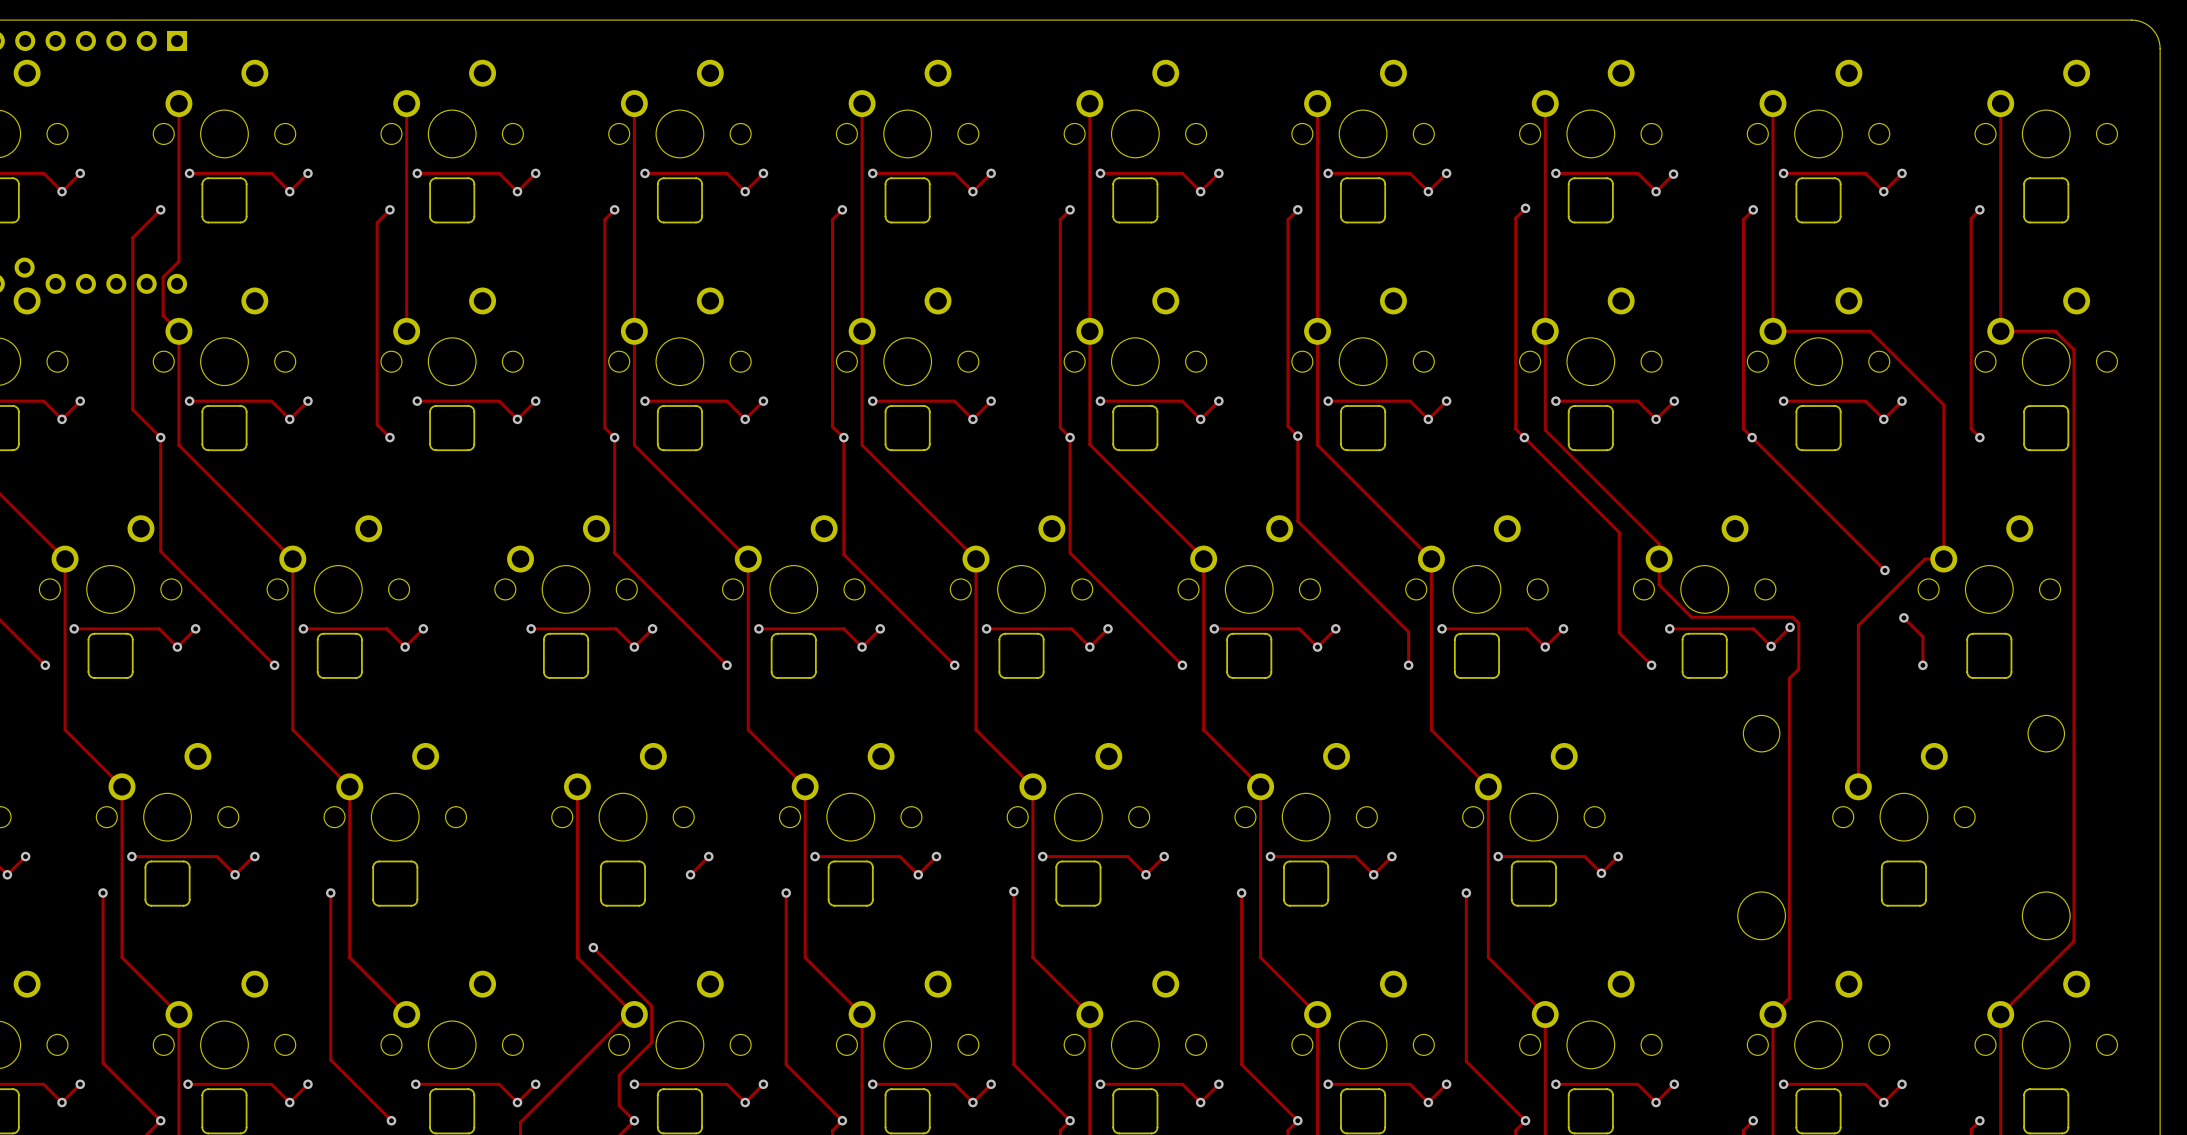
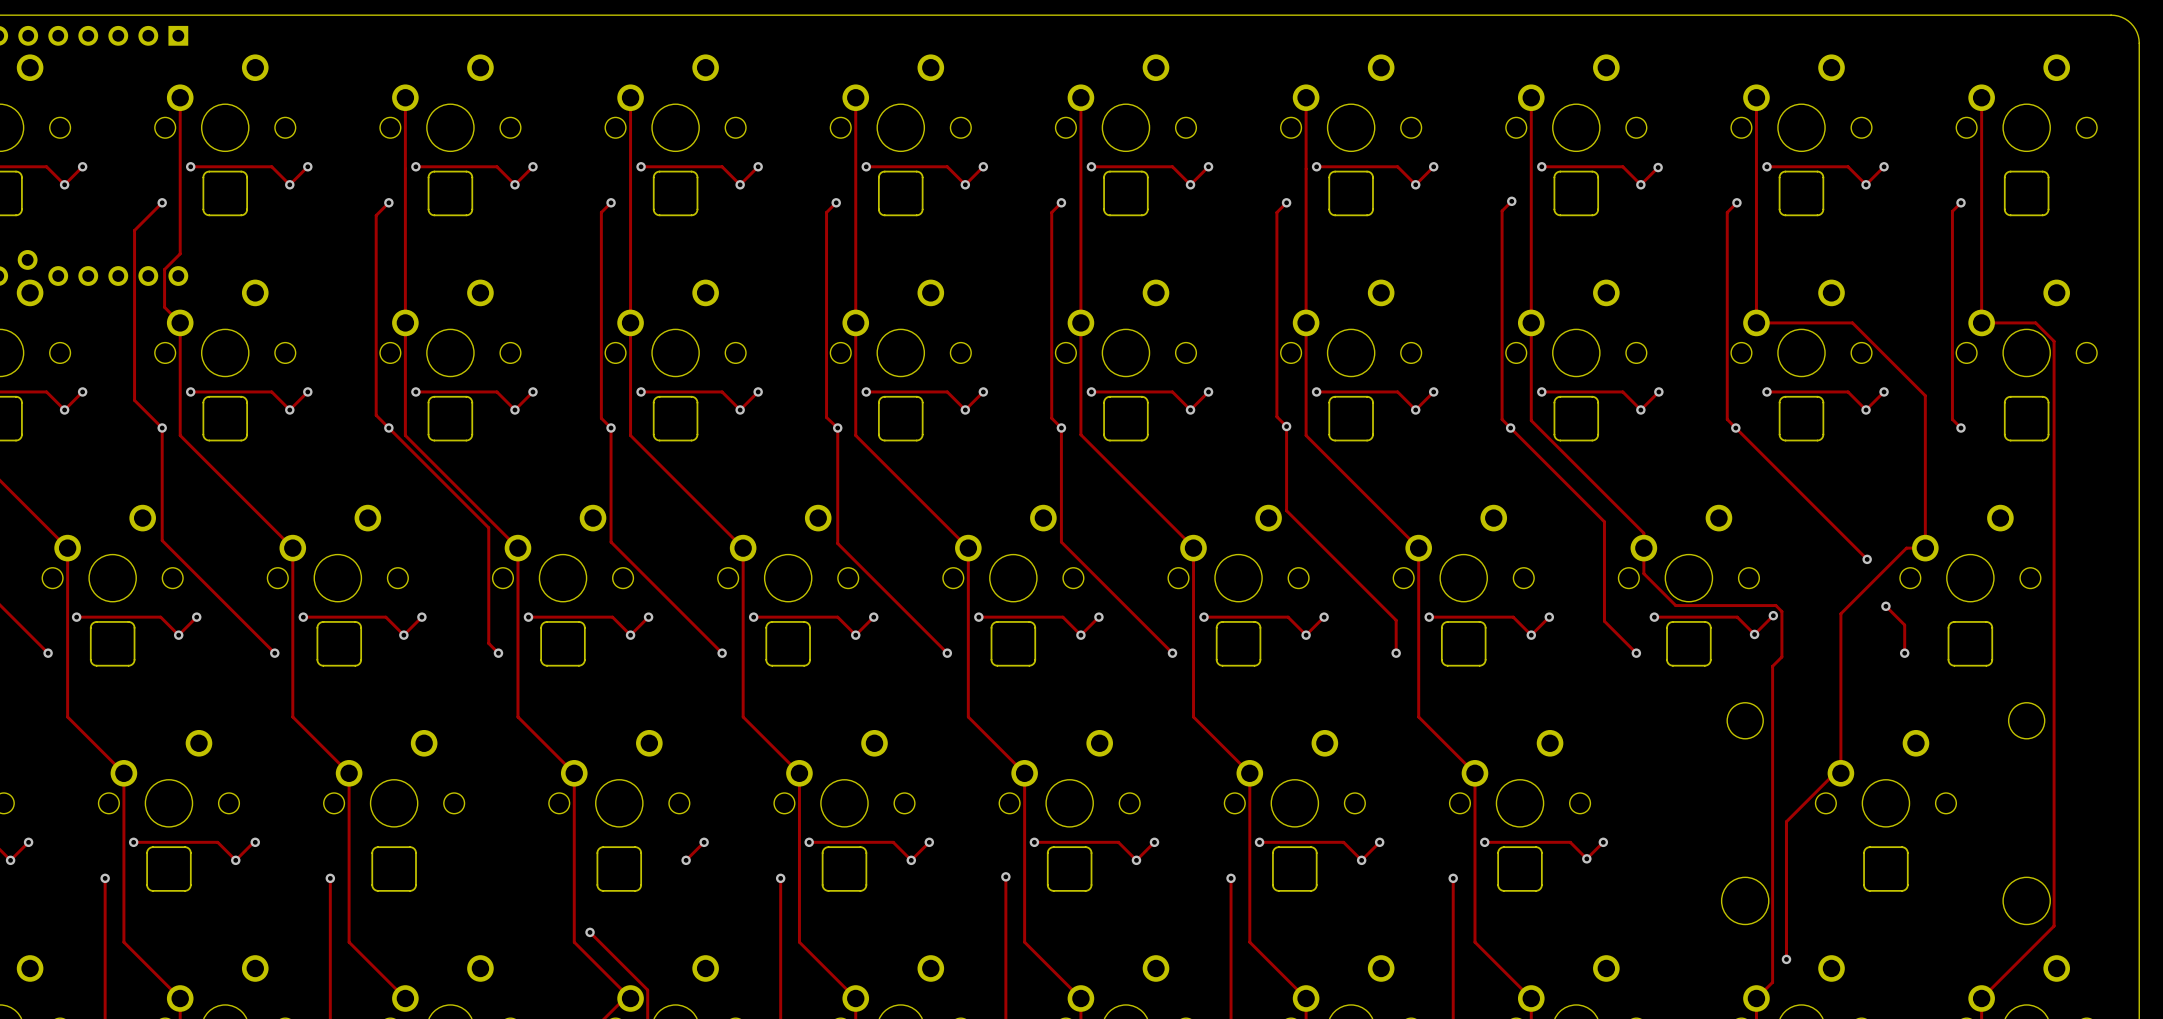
track: none -> (405, 322) (405, 435) (517, 548) (517, 717) (574, 773)
track: none -> (388, 427) (488, 527) (488, 643) (498, 653)
via: none -> (498, 653)
track: none -> (1840, 773) (1834, 773) (1786, 821) (1786, 959)
via: none -> (1786, 959)

